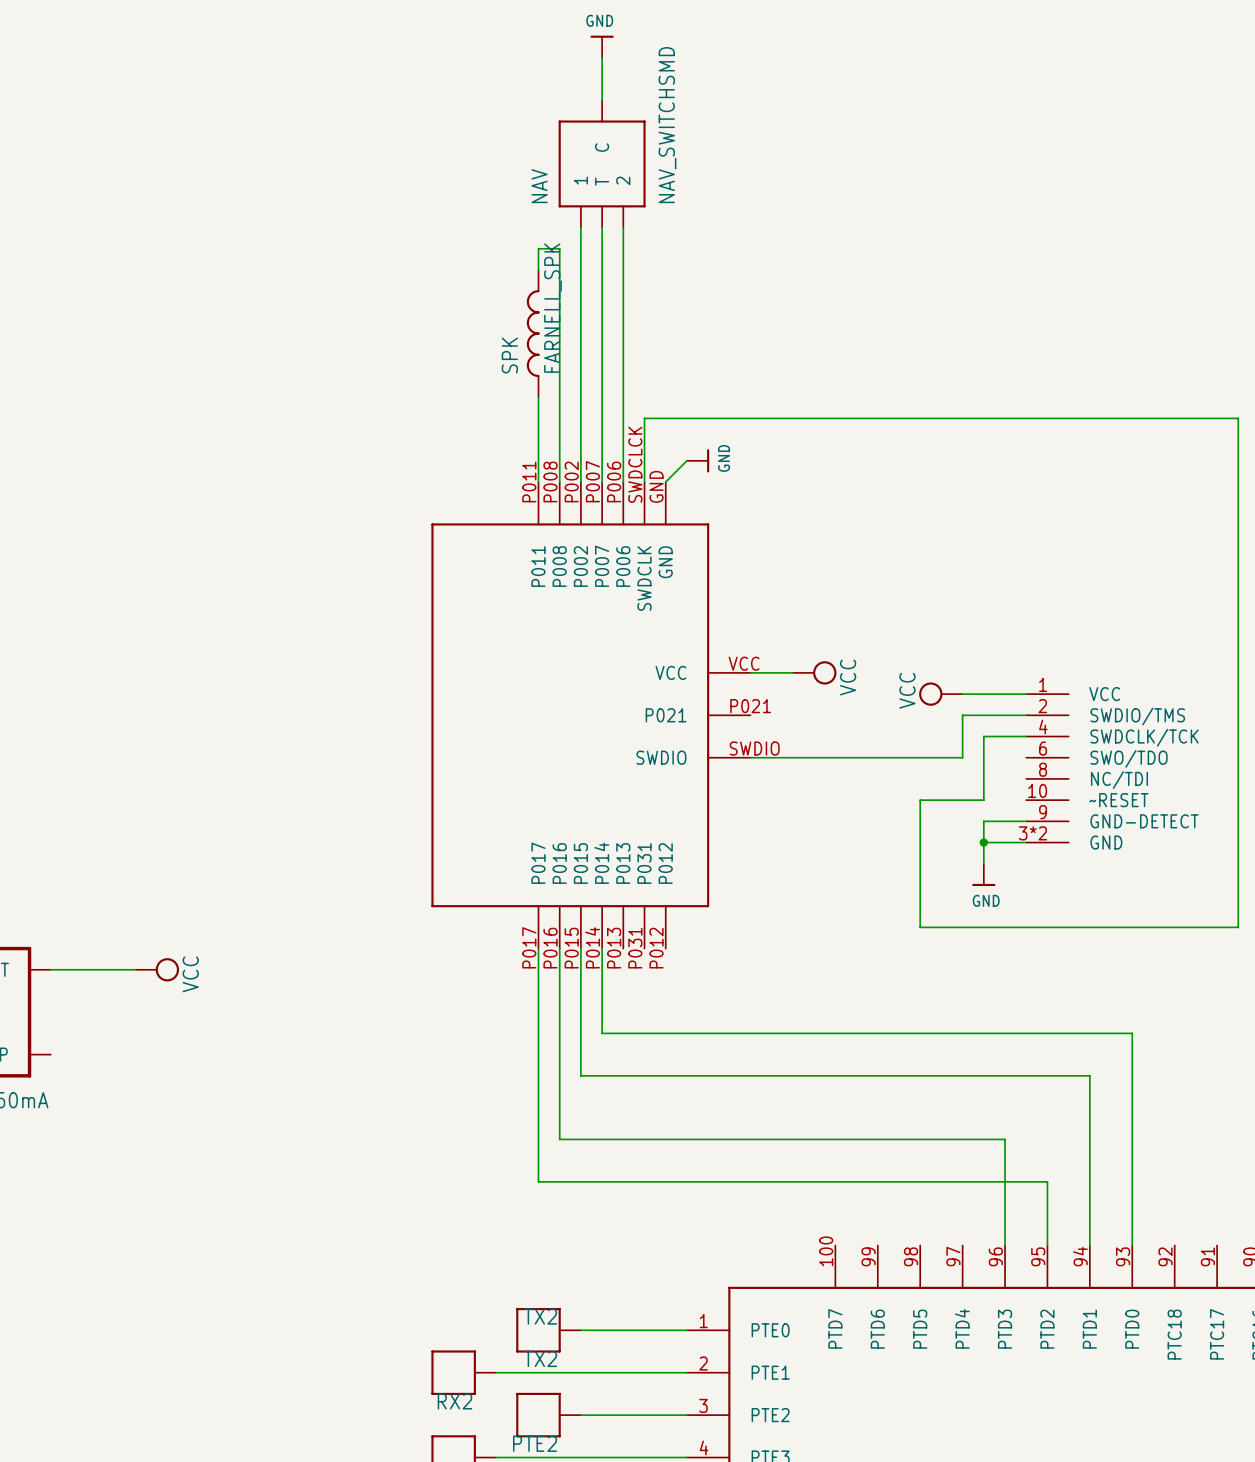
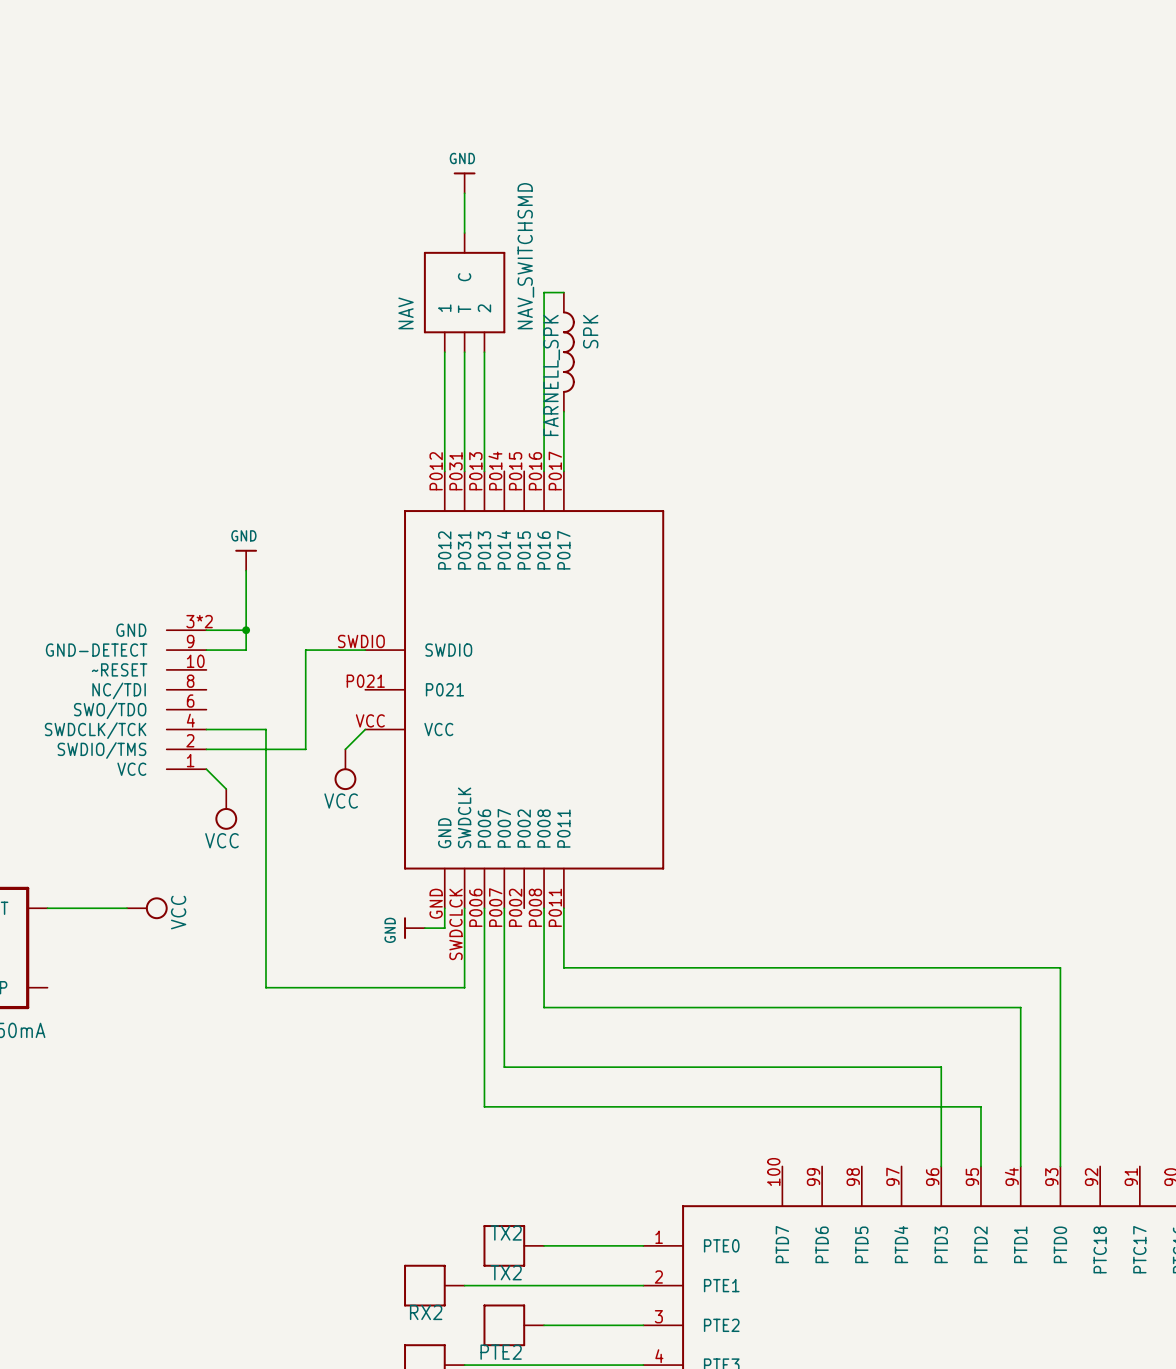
power symbol: GND (602, 46) -> none
wire: (602, 57) (602, 100) -> (464, 193) (464, 232)
NAV position: (602, 163) -> (464, 292)
power symbol: none -> GND (464, 182)
wire: (580, 227) (580, 312) -> (563, 292) (544, 292)
wire: (602, 227) (602, 439) -> none
wire: (623, 227) (623, 482) -> none
wire: (538, 269) (538, 248) (559, 248) (559, 482) -> none
SPK rotation: 0° (533, 333) -> 180° (568, 352)
SPK position: (533, 333) -> (568, 352)
wire: none -> (444, 352) (444, 471)
wire: none -> (464, 352) (464, 471)
wire: none -> (484, 352) (484, 471)
wire: (538, 397) (538, 482) -> none
wire: (686, 460) (665, 482) -> none
power symbol: GND (698, 460) -> none
wire: (644, 482) (644, 418) (1238, 418) (1238, 927) (920, 927) (920, 800) (983, 800) (983, 736) (1026, 736) -> none
power symbol: none -> GND (246, 560)
wire: none -> (246, 570) (246, 650) (206, 650)
wire: none -> (206, 630) (246, 630)
junction: none -> (246, 630)
wire: (750, 672) (792, 672) -> none
power symbol: VCC (814, 672) -> none
wire: none -> (365, 650) (305, 650) (305, 749) (206, 749)
power symbol: VCC (940, 694) -> none
wire: (962, 694) (1026, 694) -> none
part rotation: 0° (570, 715) -> 180° (534, 689)
wire: (1026, 715) (962, 715) (962, 757) (750, 757) -> none
part: none -> (186, 699)
part: (1047, 768) -> none
wire: none -> (206, 729) (265, 729) (265, 987) (464, 987) (464, 908)
wire: none -> (365, 729) (345, 749)
wire: none -> (206, 769) (226, 789)
power symbol: none -> VCC (345, 769)
wire: (1026, 821) (983, 821) (983, 863) -> none
wire: (983, 842) (1026, 842) -> none
junction: (983, 842) -> none
power symbol: none -> VCC (226, 809)
power symbol: GND (983, 874) -> none
wire: (559, 948) (559, 1139) -> none
wire: none -> (444, 908) (444, 928) (424, 928)
wire: none -> (484, 908) (484, 1106) (504, 1106)
power symbol: none -> GND (414, 928)
wire: (538, 1139) (538, 1181) -> (504, 1067) (524, 1067)

